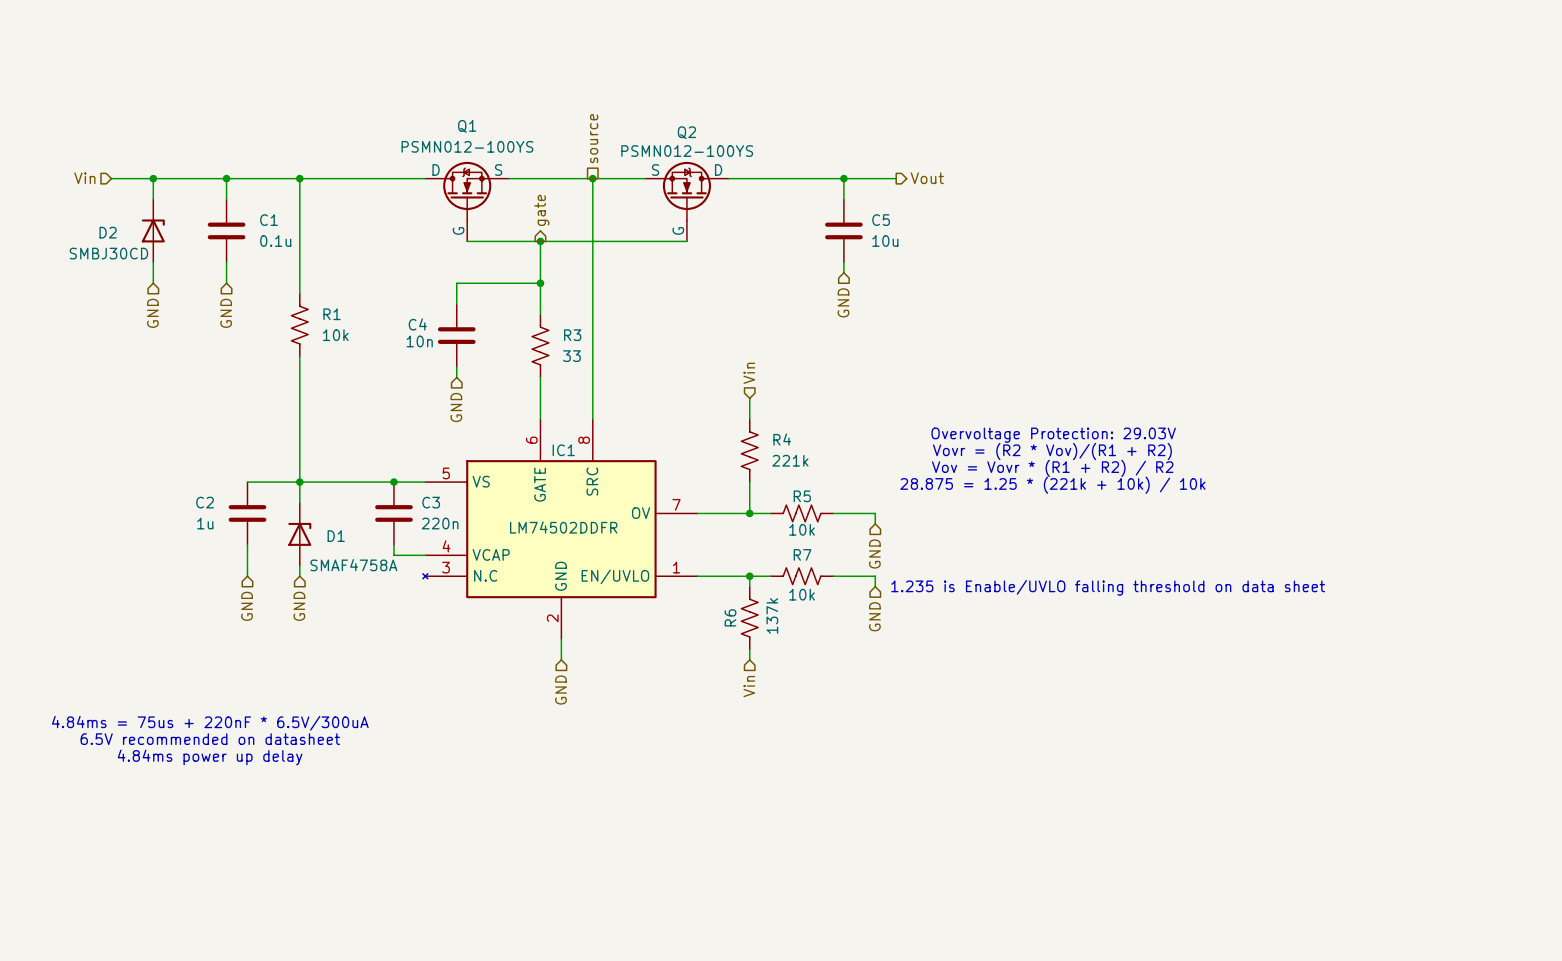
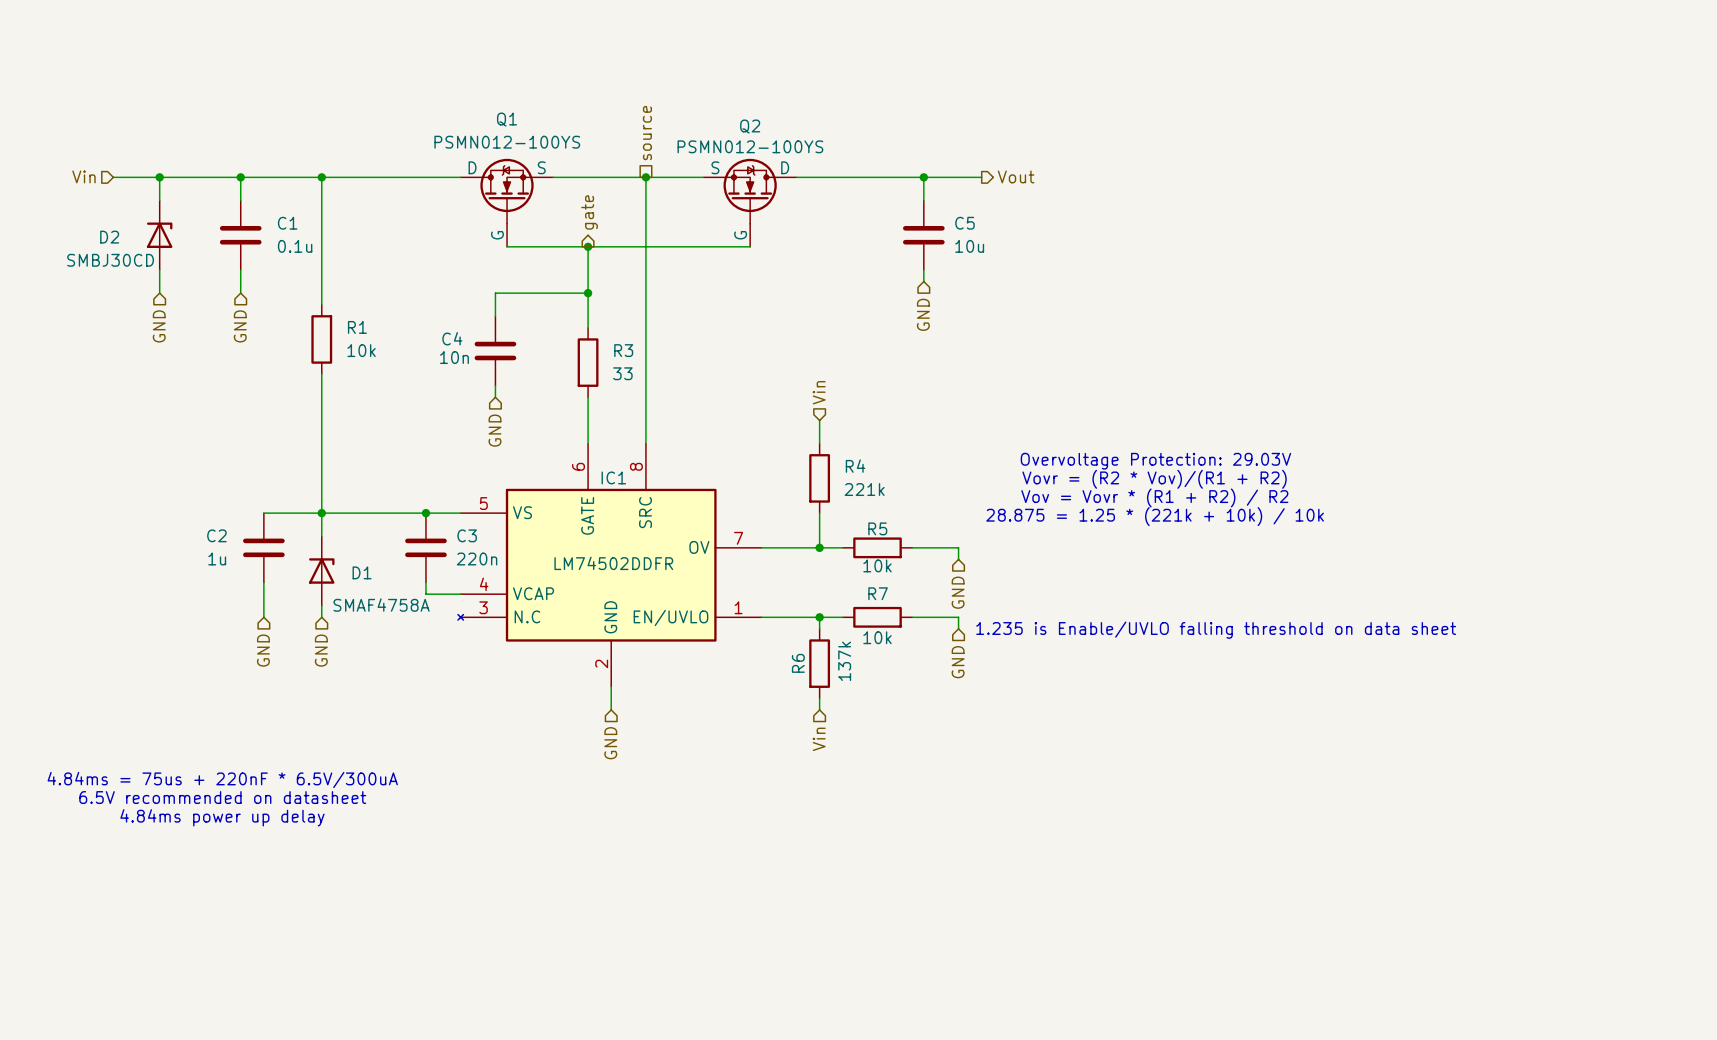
R1 symbol: [291, 293, 309, 357] -> [311, 304, 333, 375]
R3 symbol: [532, 314, 549, 378] -> [577, 327, 599, 398]
R4 symbol: [741, 419, 759, 483] -> [809, 443, 831, 514]
R5 symbol: [770, 505, 834, 522] -> [842, 537, 913, 559]
R7 symbol: [770, 567, 834, 585] -> [842, 606, 913, 628]
R6 symbol: [741, 586, 759, 650] -> [809, 628, 831, 699]

